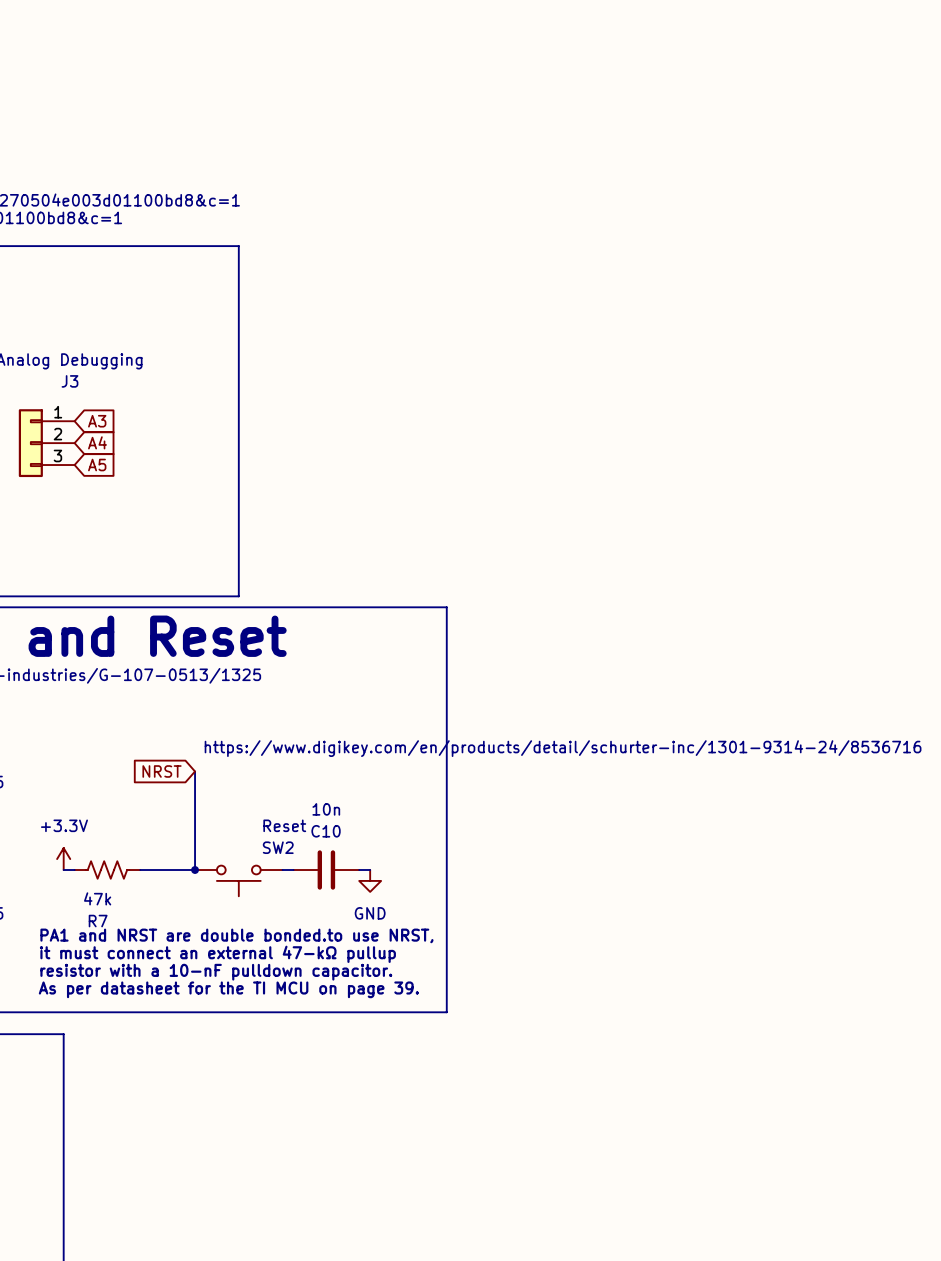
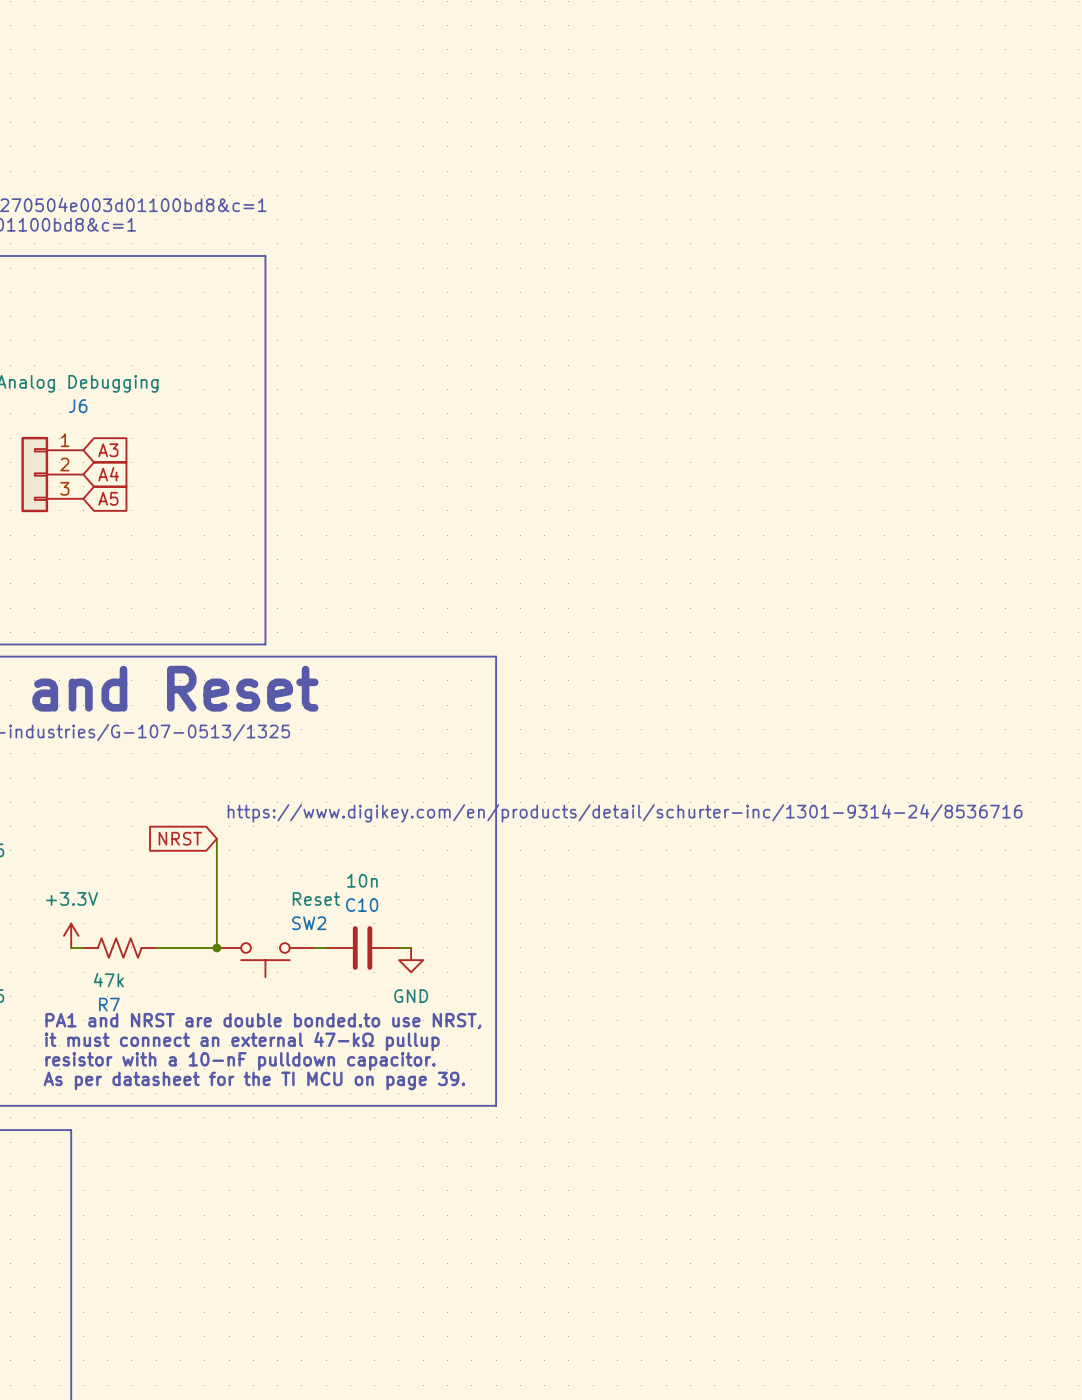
J3 name: J3 (69, 381) -> J6 (78, 406)

